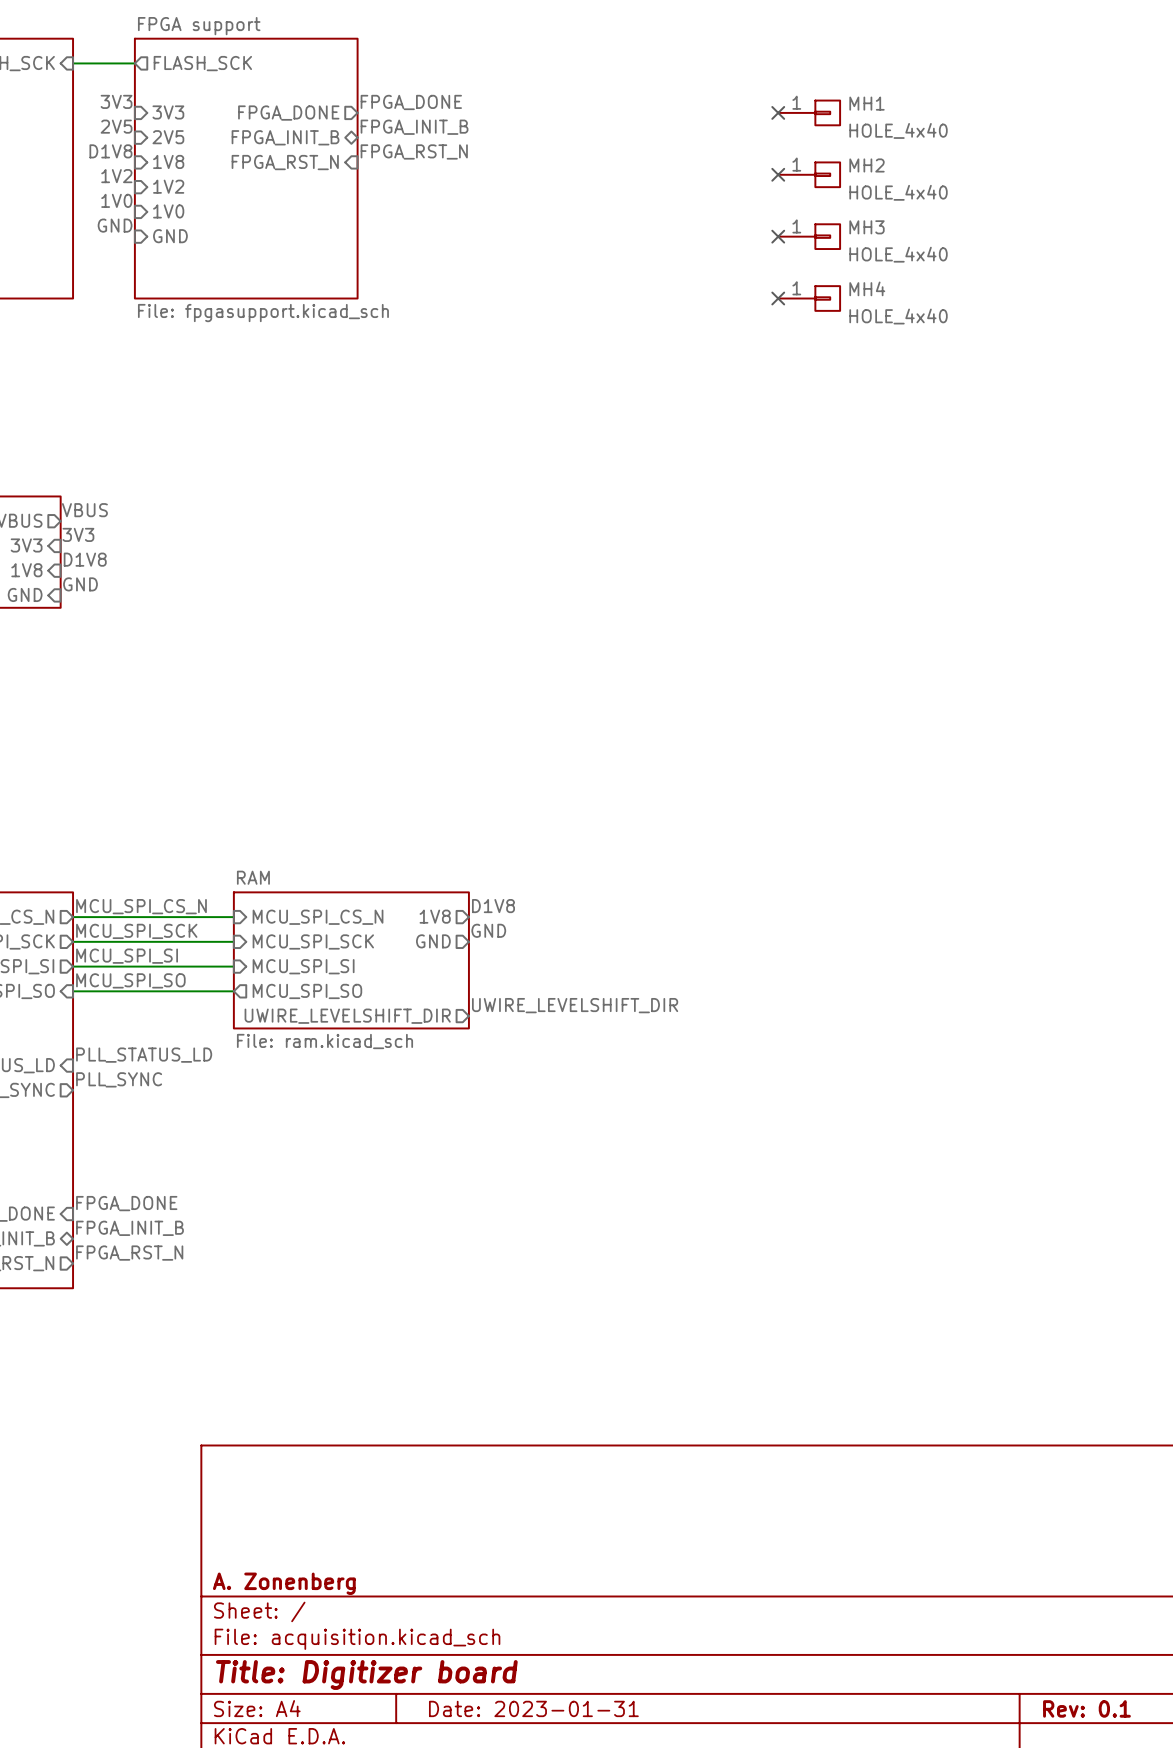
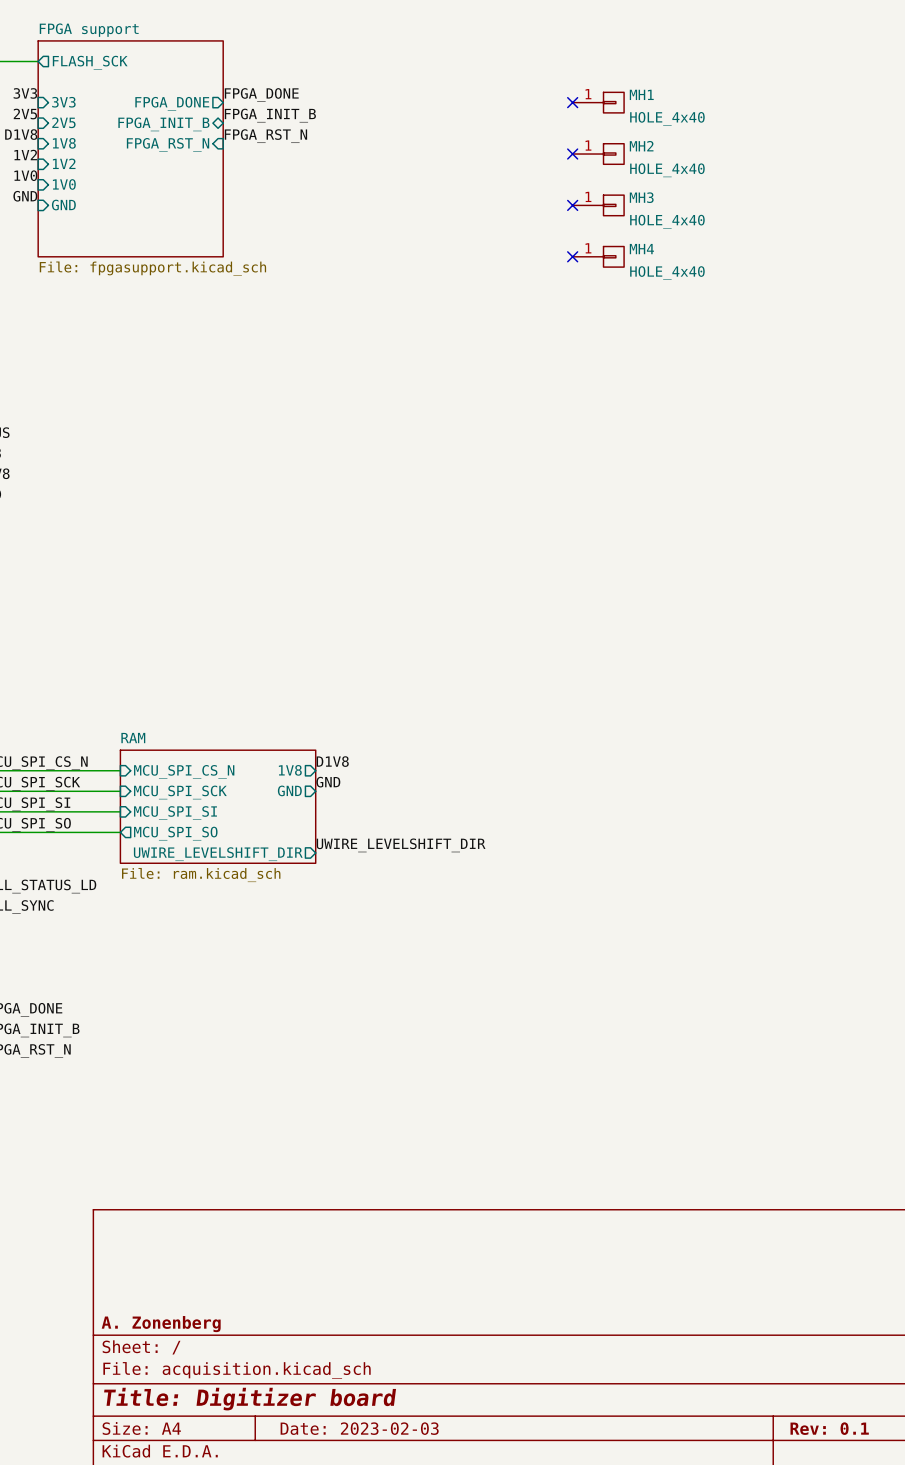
title block: Date: 2023-01-31 (533, 1708) -> Date: 2023-02-03 (359, 1428)

